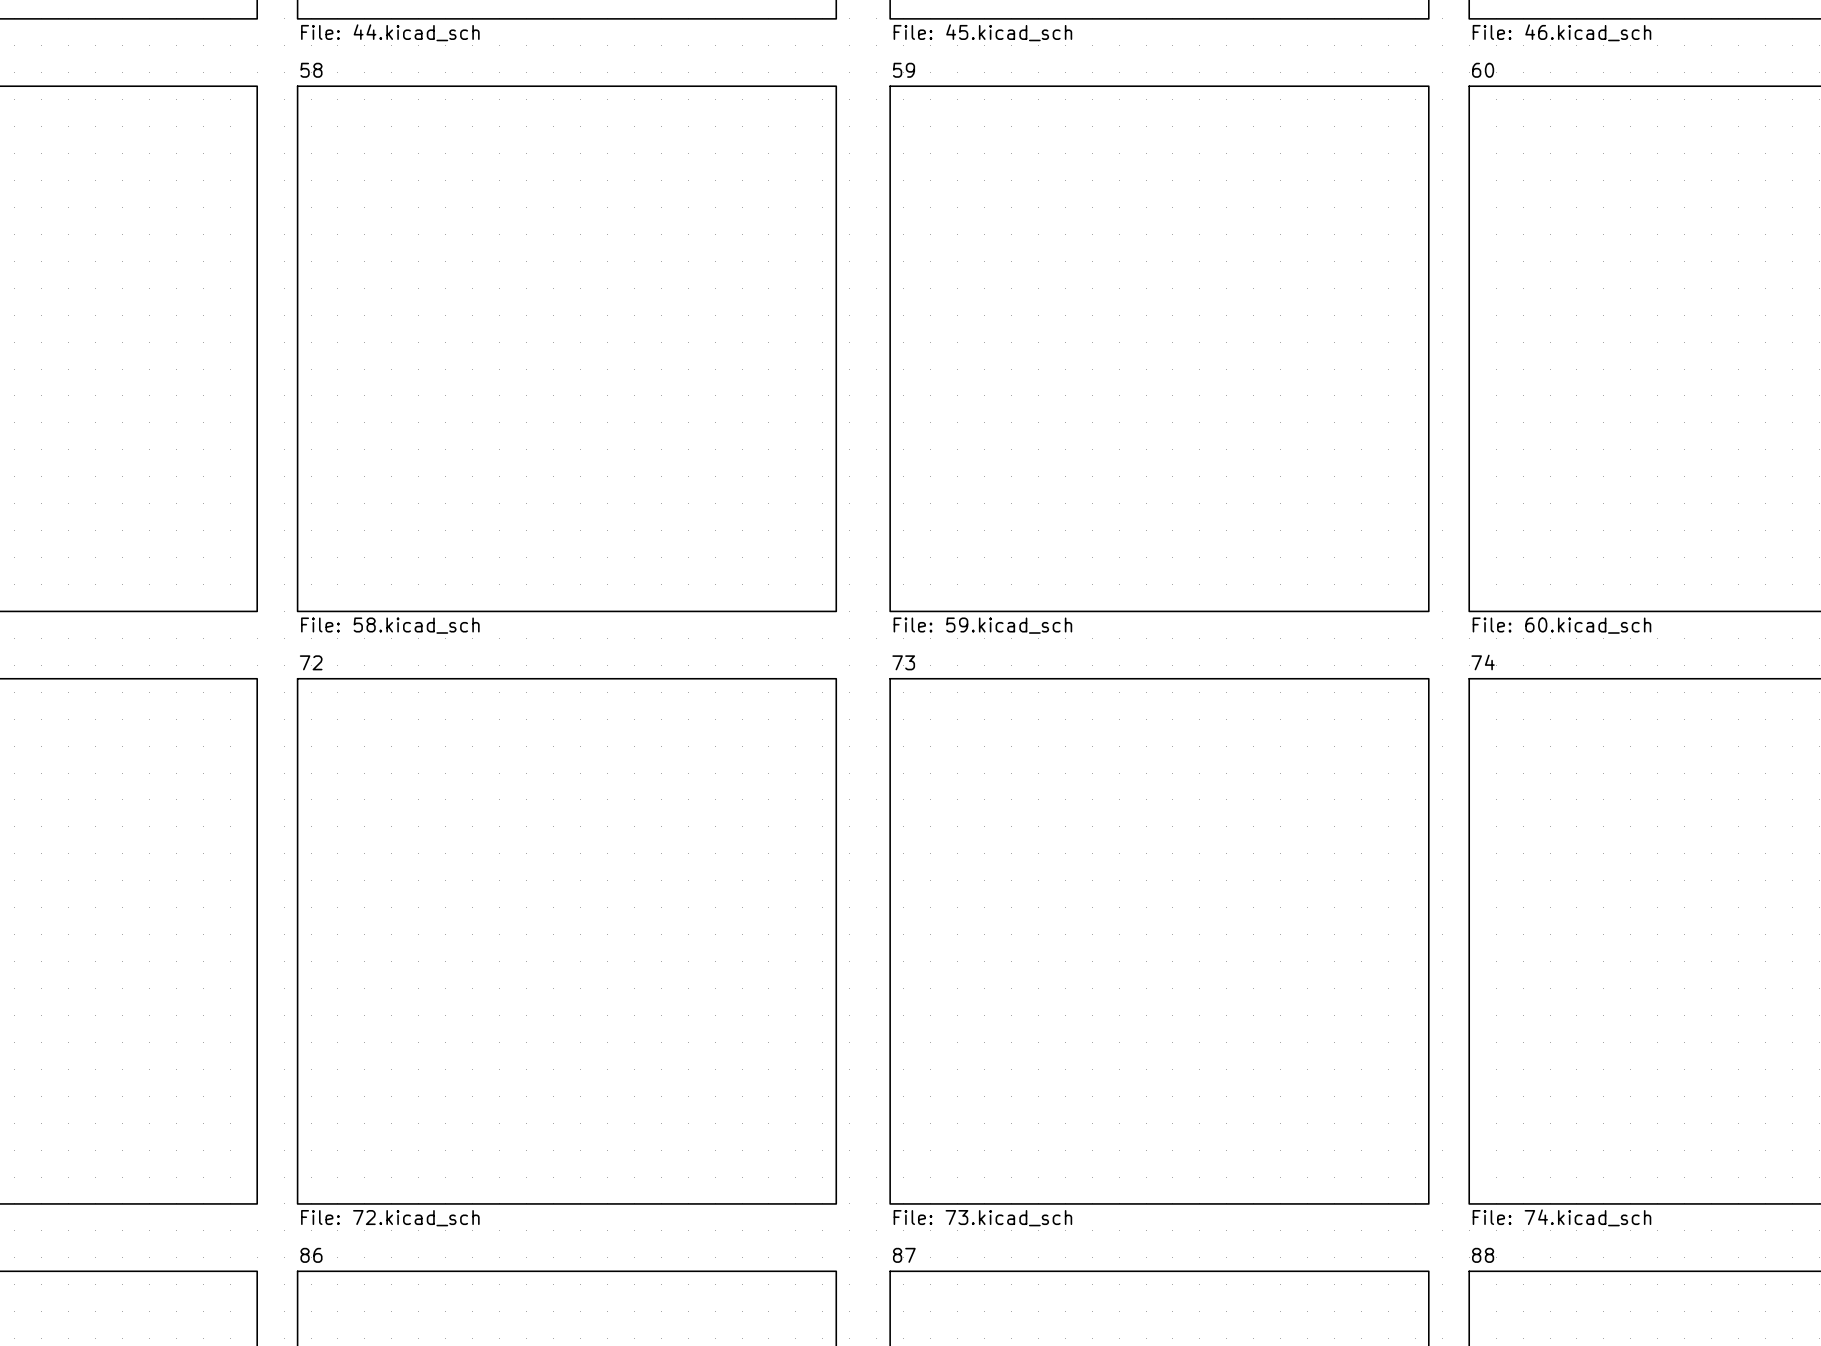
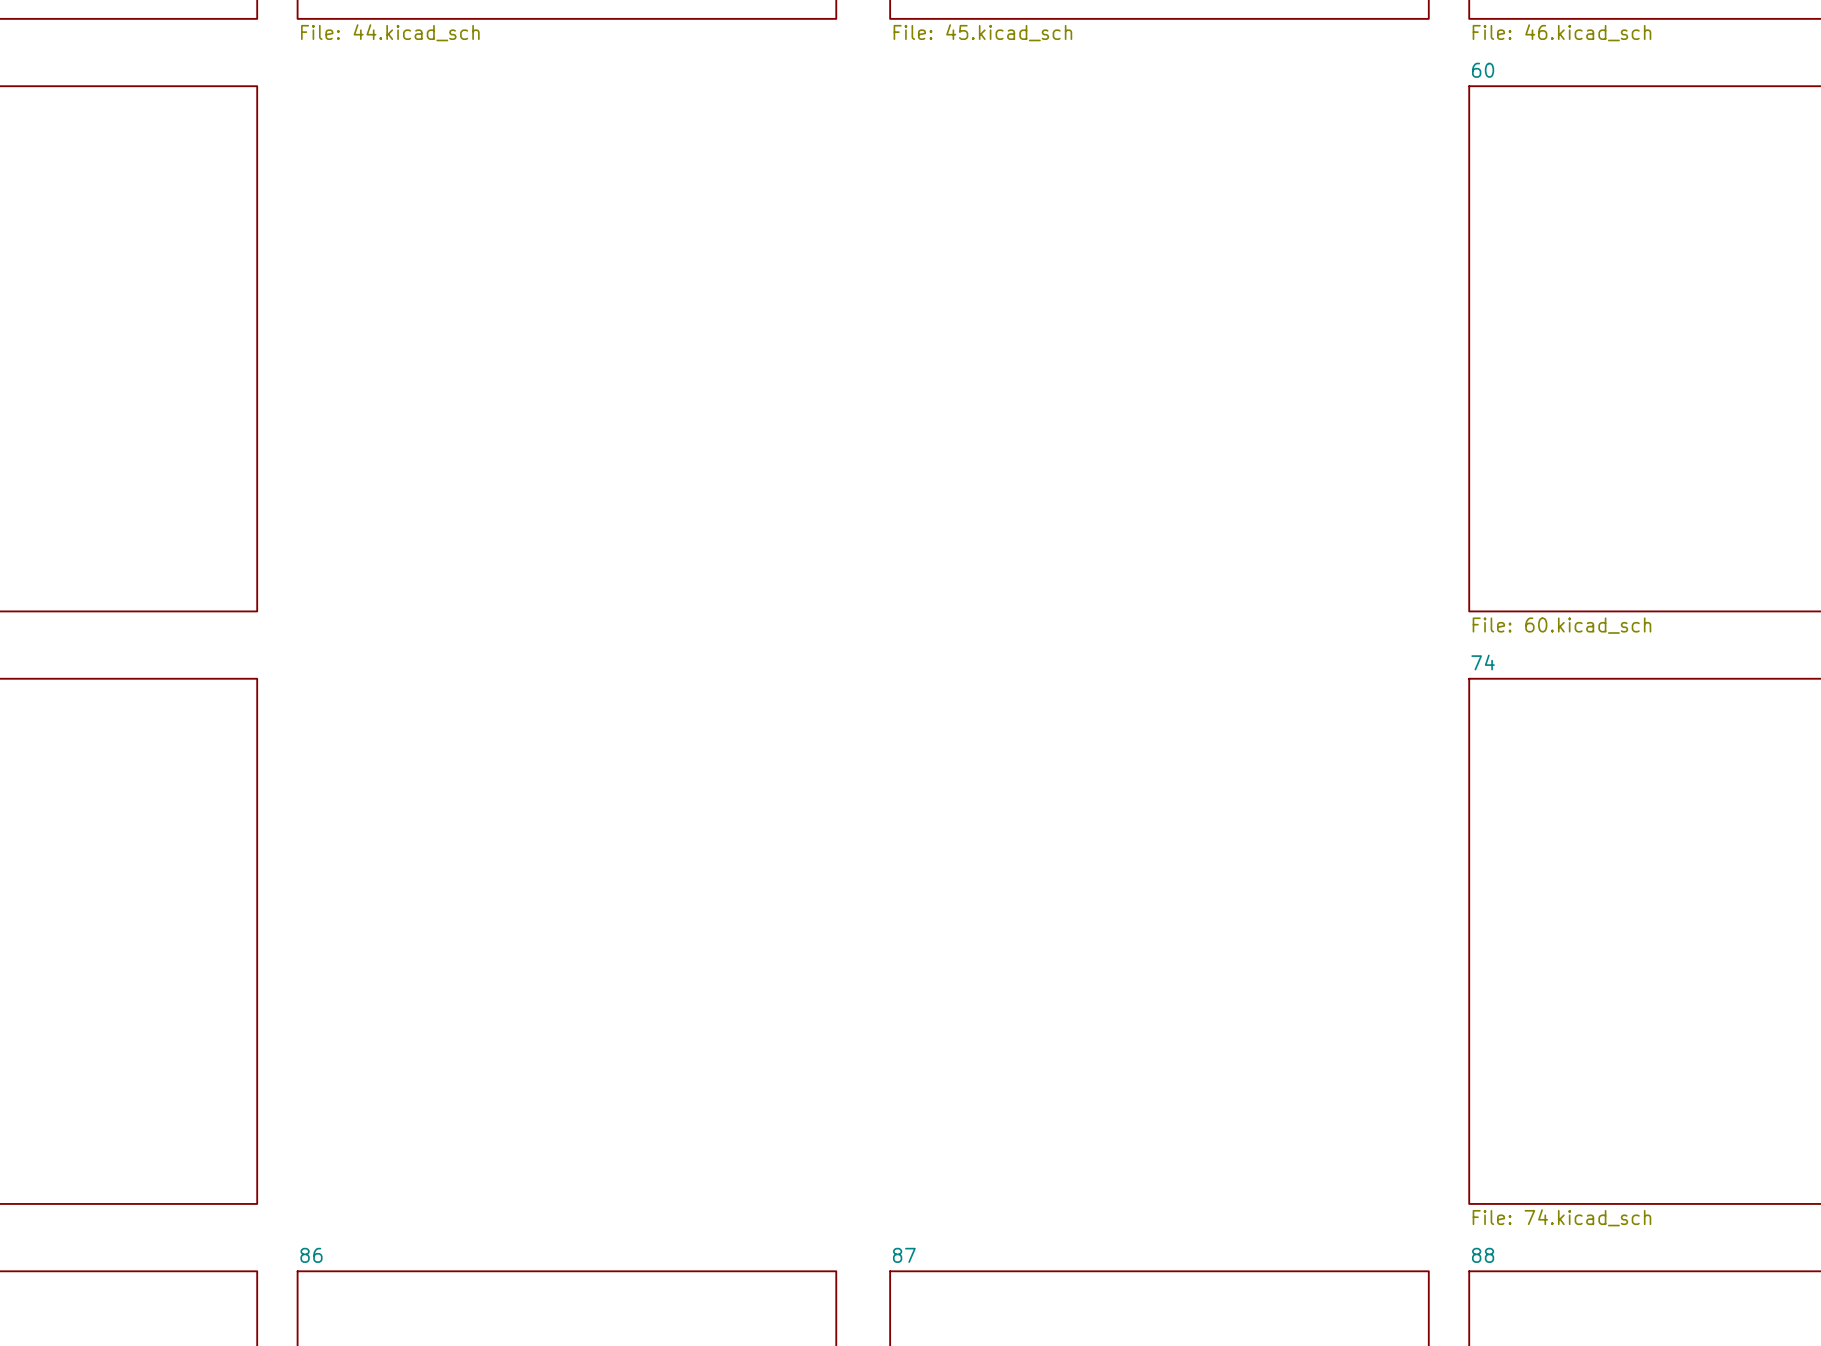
sheet 58: File: 58.kicad_sch (566, 348) -> none
sheet 59: File: 59.kicad_sch (1159, 348) -> none
sheet 72: File: 72.kicad_sch (566, 941) -> none
sheet 73: File: 73.kicad_sch (1159, 941) -> none

